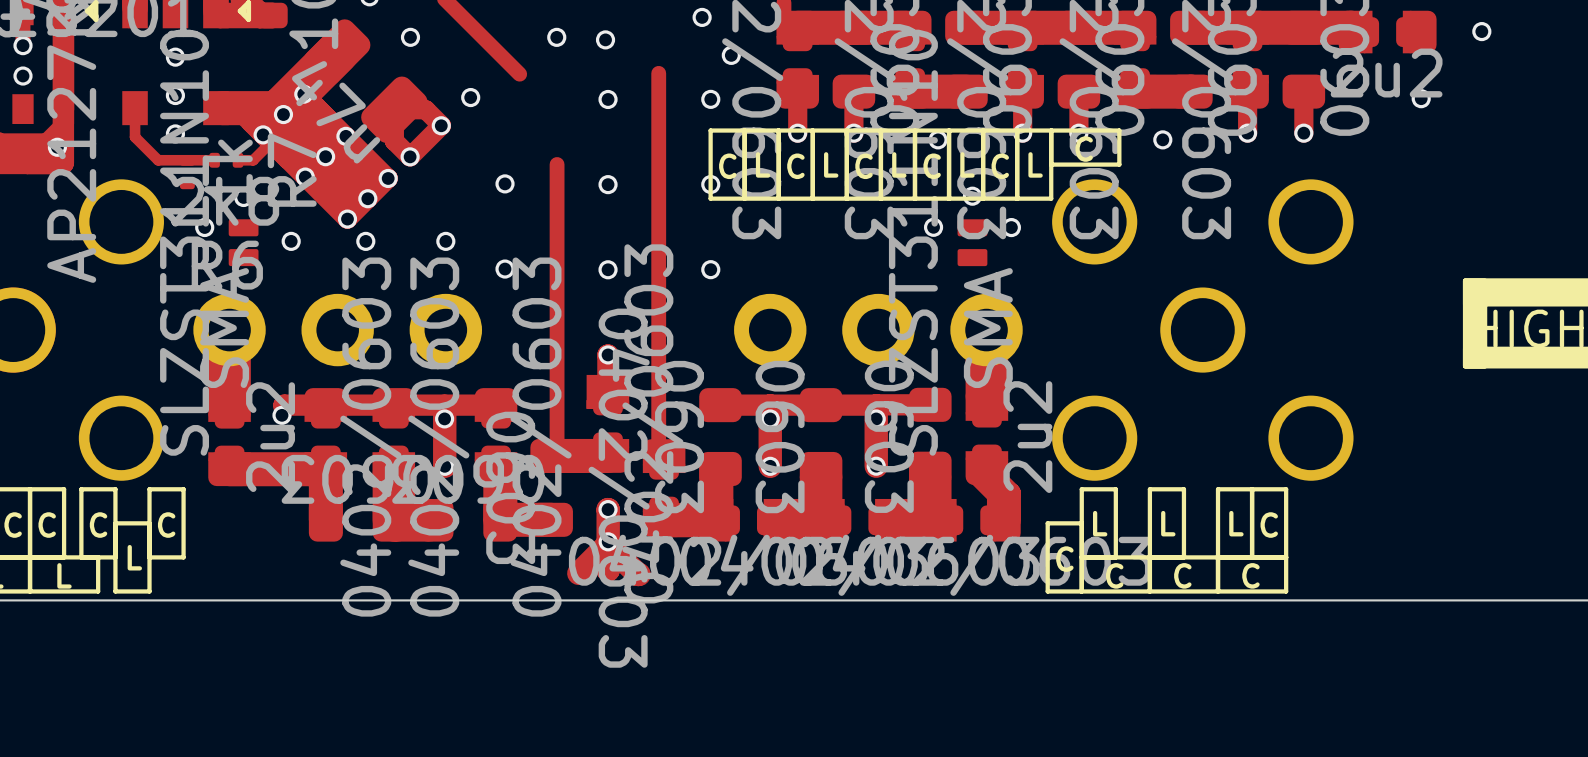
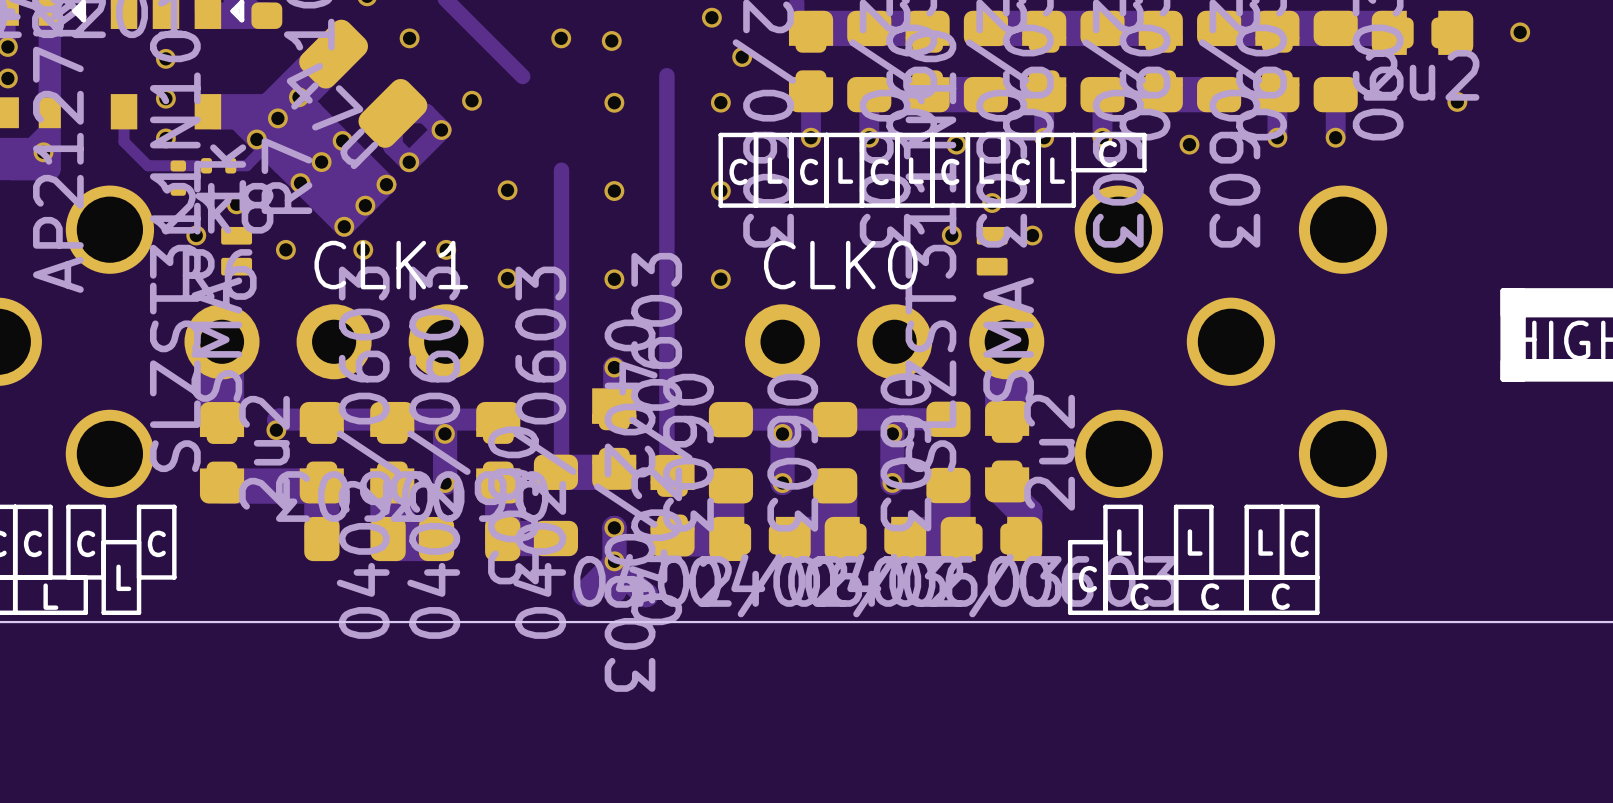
text: none -> CLK1 (391, 265)
text: none -> CLK0 (840, 265)

